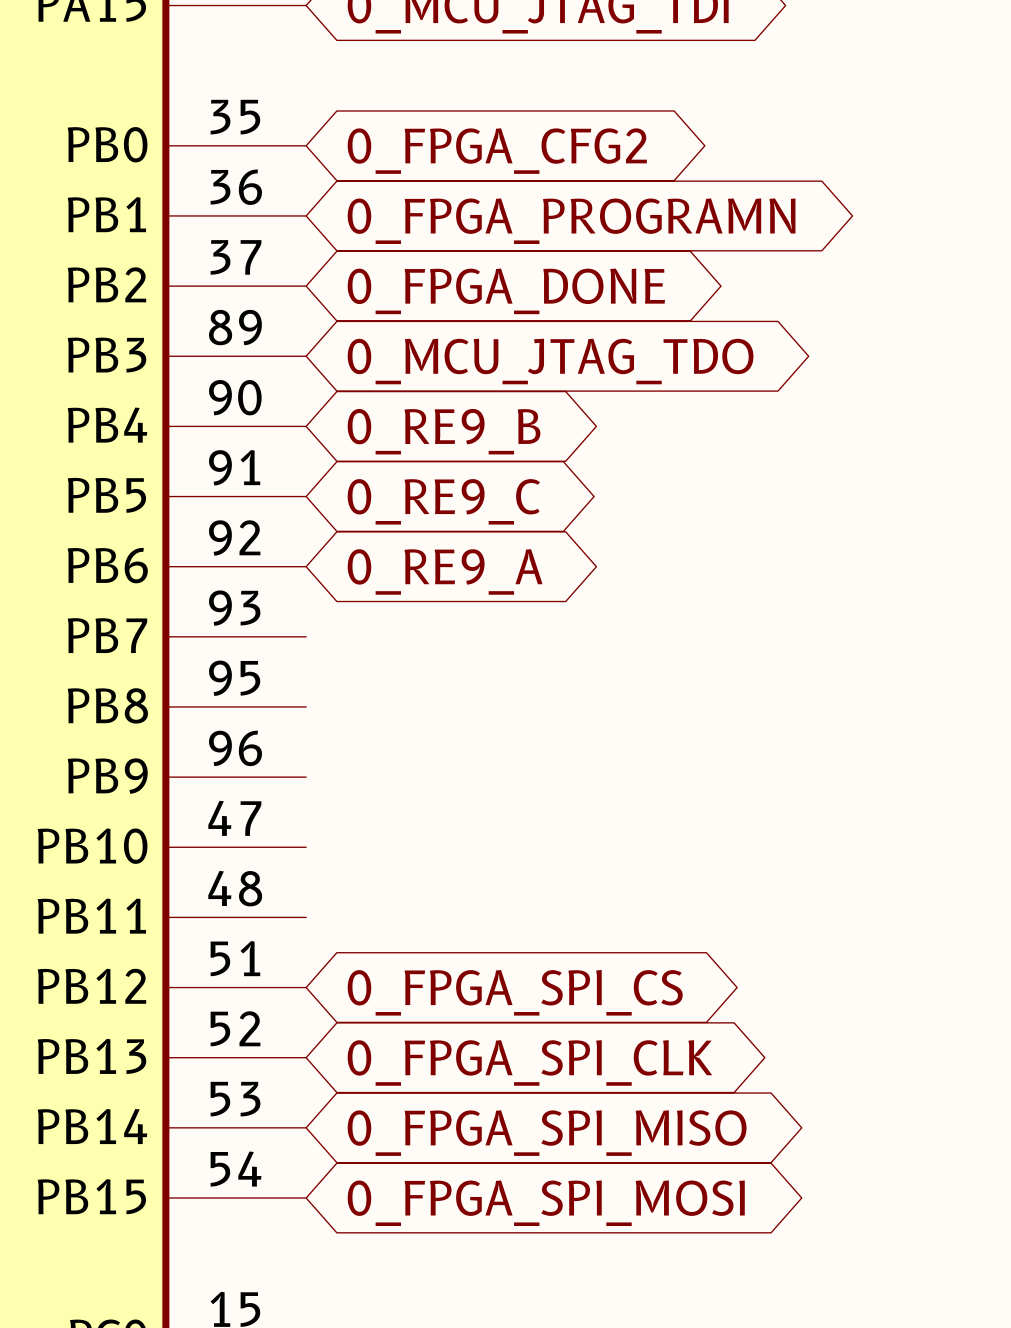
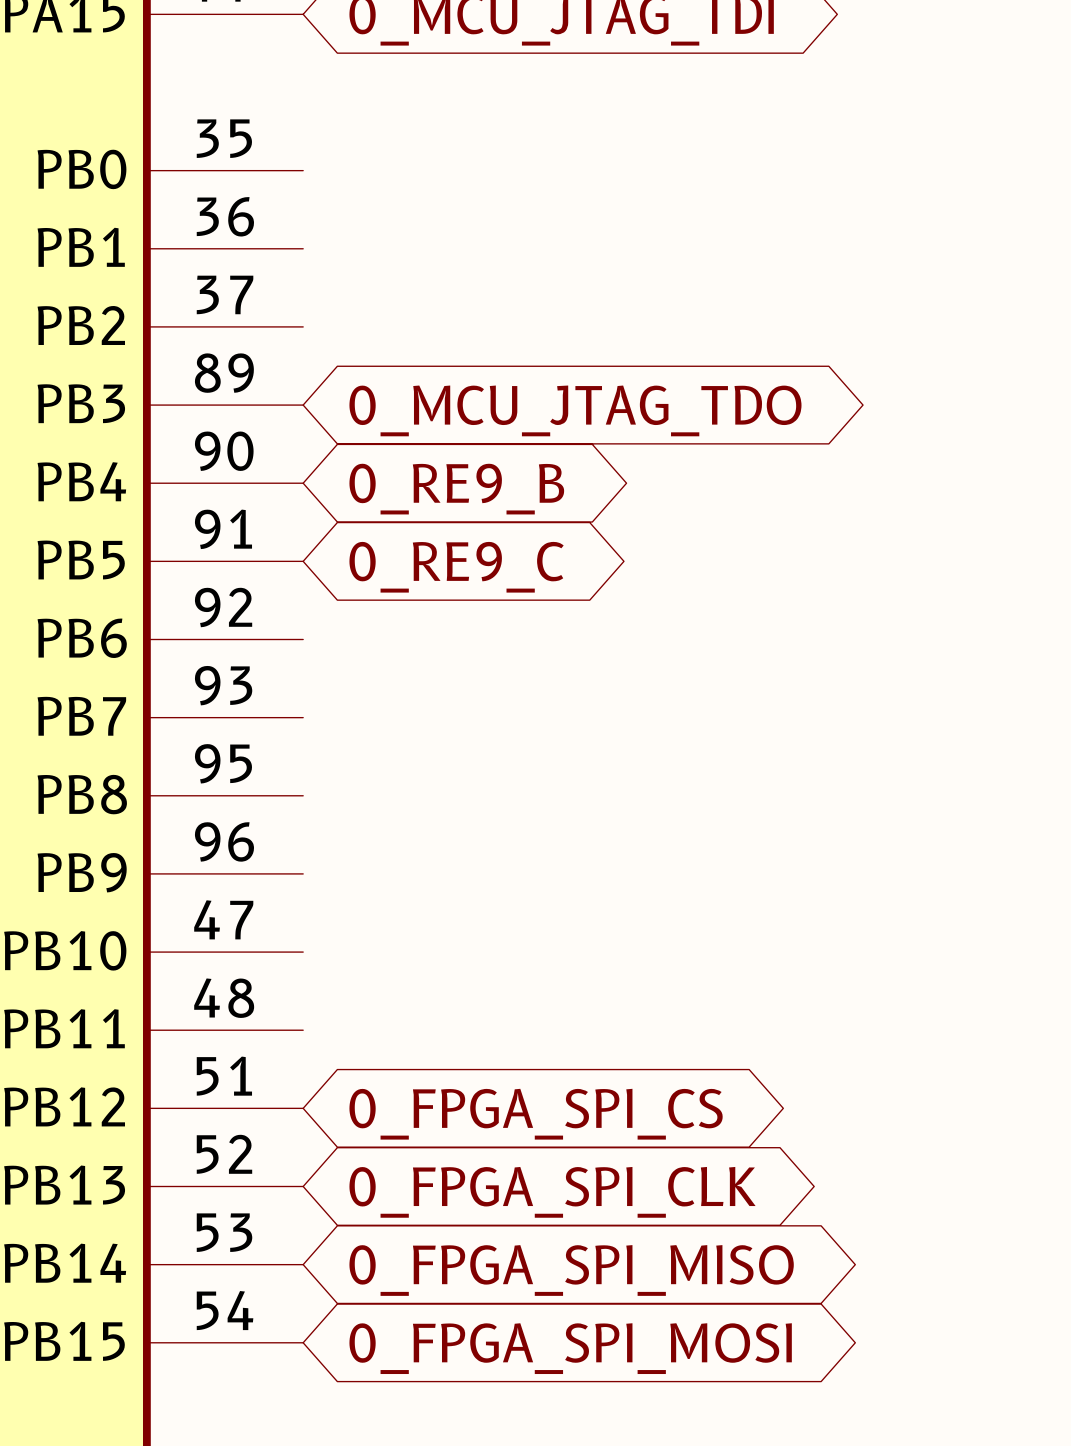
global label: 0_FPGA_CFG2 (497, 151) -> none
global label: 0_FPGA_PROGRAMN (571, 221) -> none
global label: 0_FPGA_DONE (506, 291) -> none
global label: 0_RE9_A (445, 571) -> none

